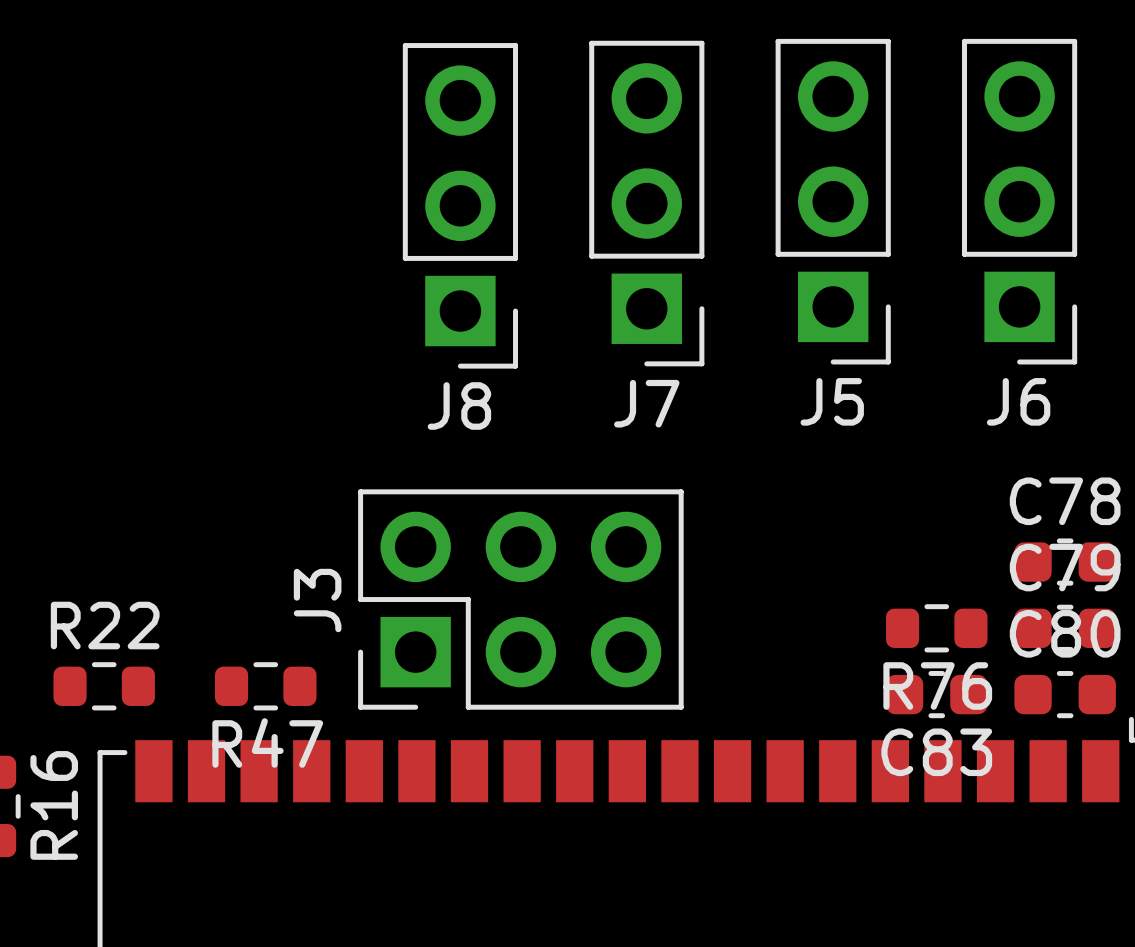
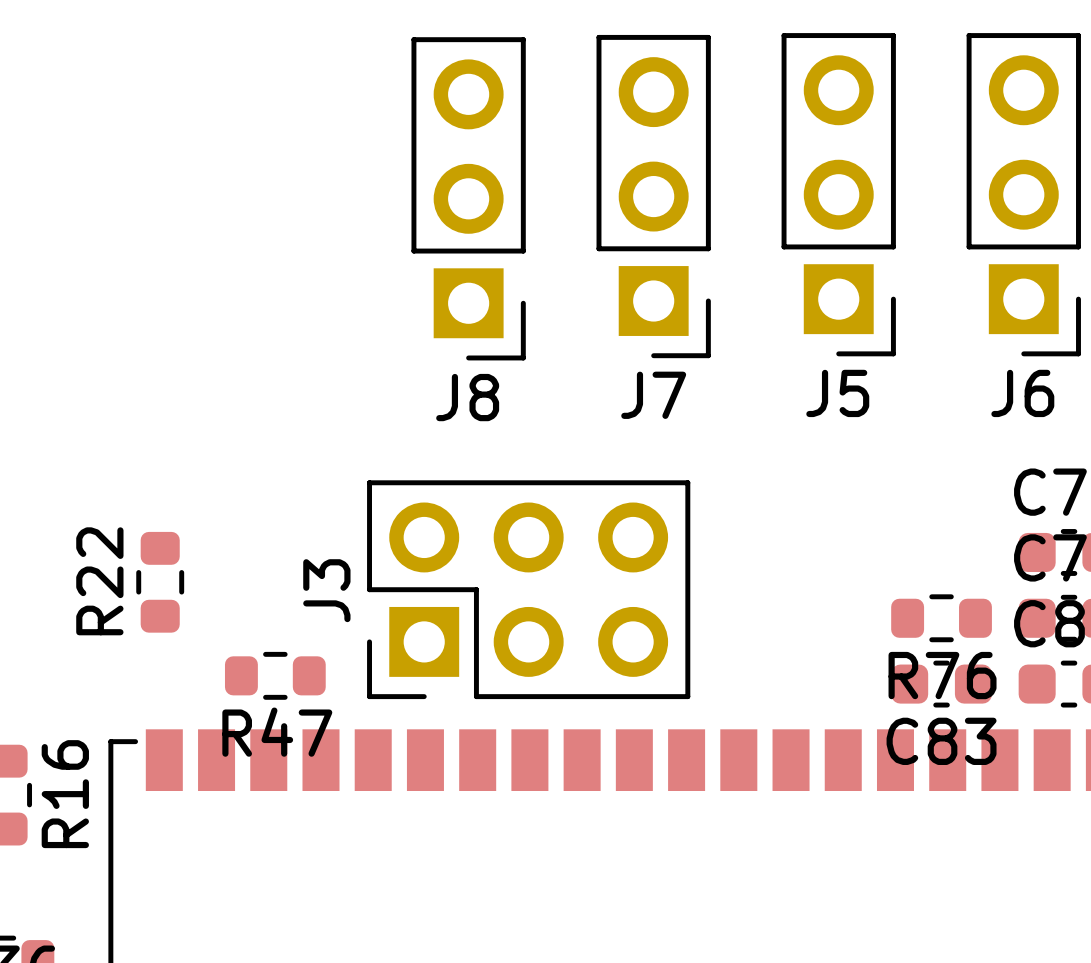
R22 name position: R22 (105, 625) -> R22 (99, 581)
R22 rotation: 0° (104, 686) -> 90° clockwise (160, 582)
R22 position: (104, 686) -> (160, 582)

